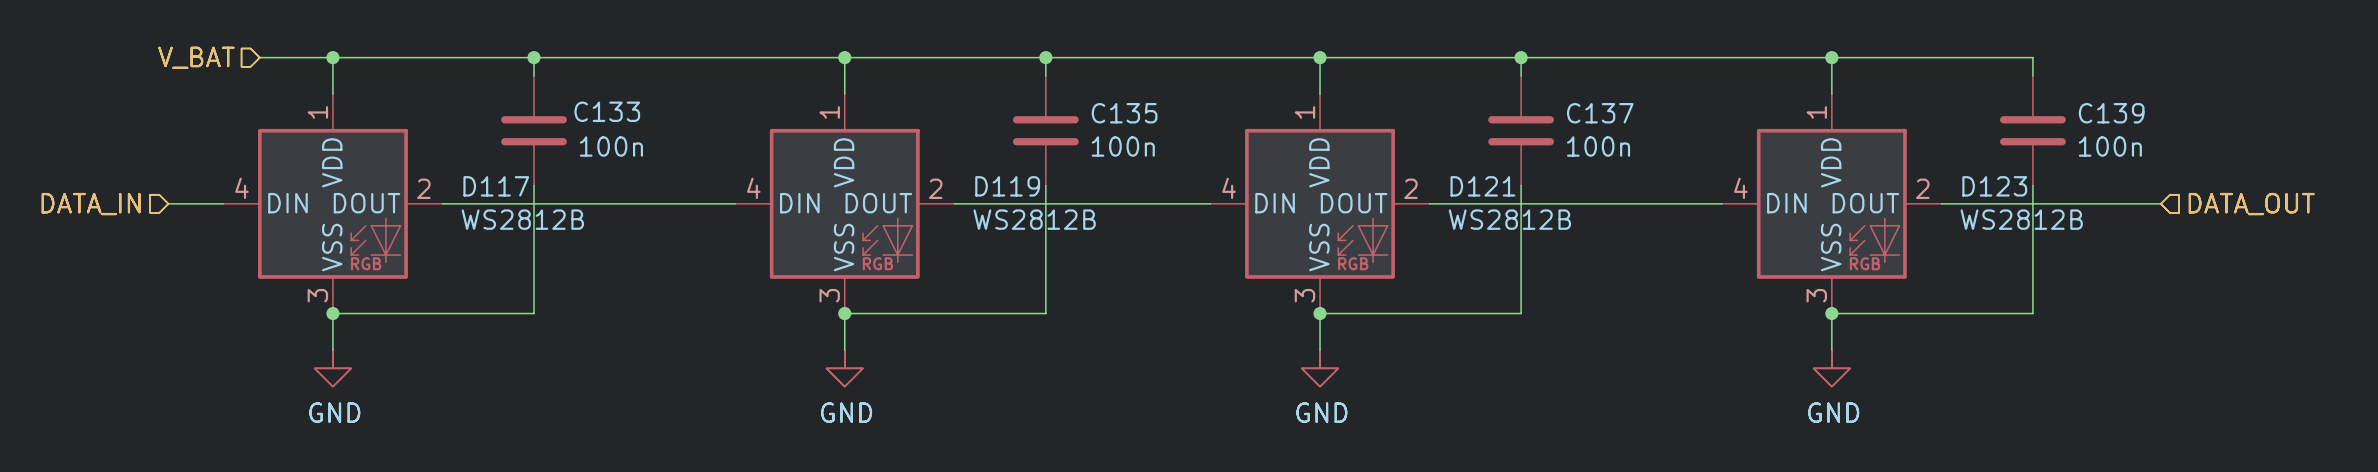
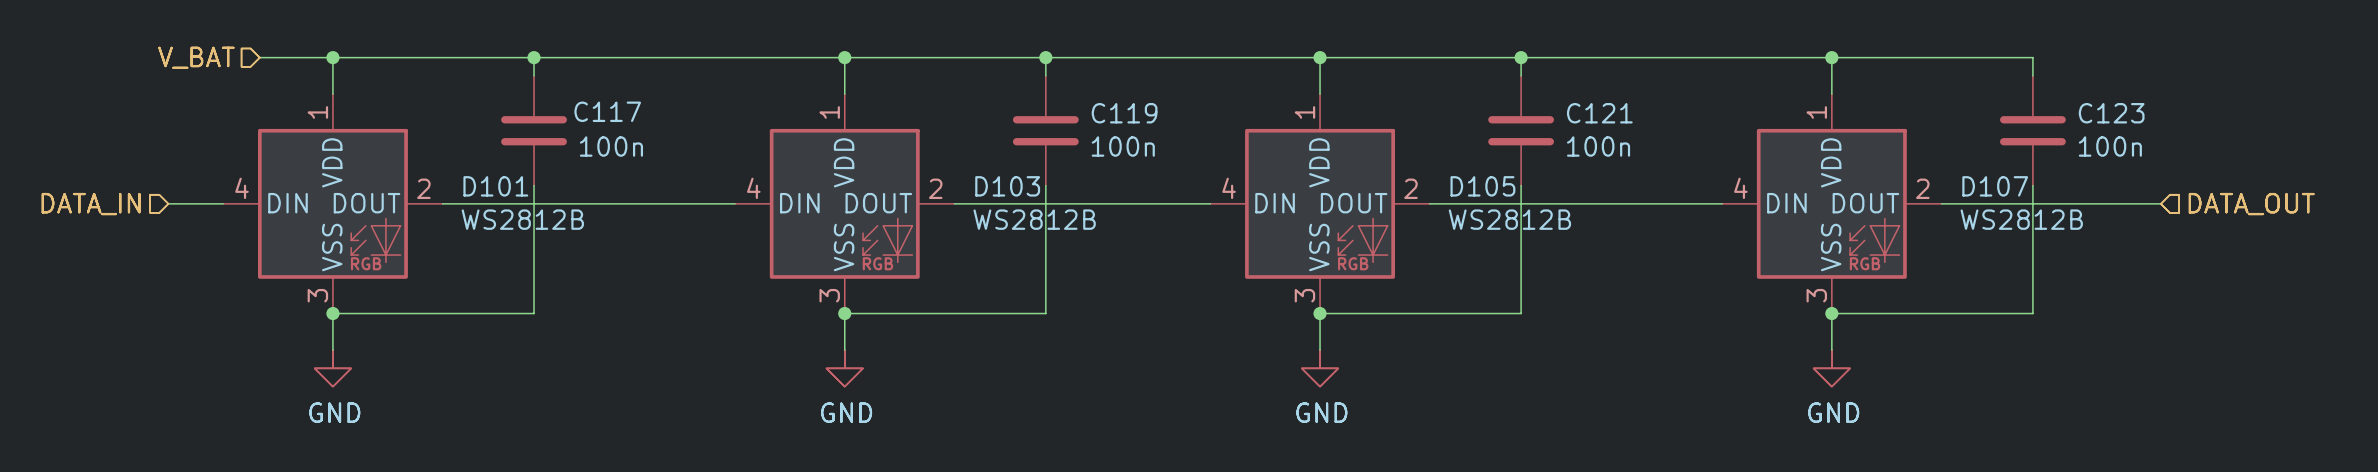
C133 name: C133 (607, 111) -> C117 (607, 111)
C135 name: C135 (1124, 113) -> C119 (1124, 113)
C137 name: C137 (1600, 113) -> C121 (1599, 113)
C139 name: C139 (2111, 113) -> C123 (2111, 113)
D117 name: D117 (496, 186) -> D101 (495, 186)
D119 name: D119 (1007, 186) -> D103 (1007, 186)
D121 name: D121 (1482, 186) -> D105 (1482, 186)
D123 name: D123 (1994, 186) -> D107 (1995, 186)

